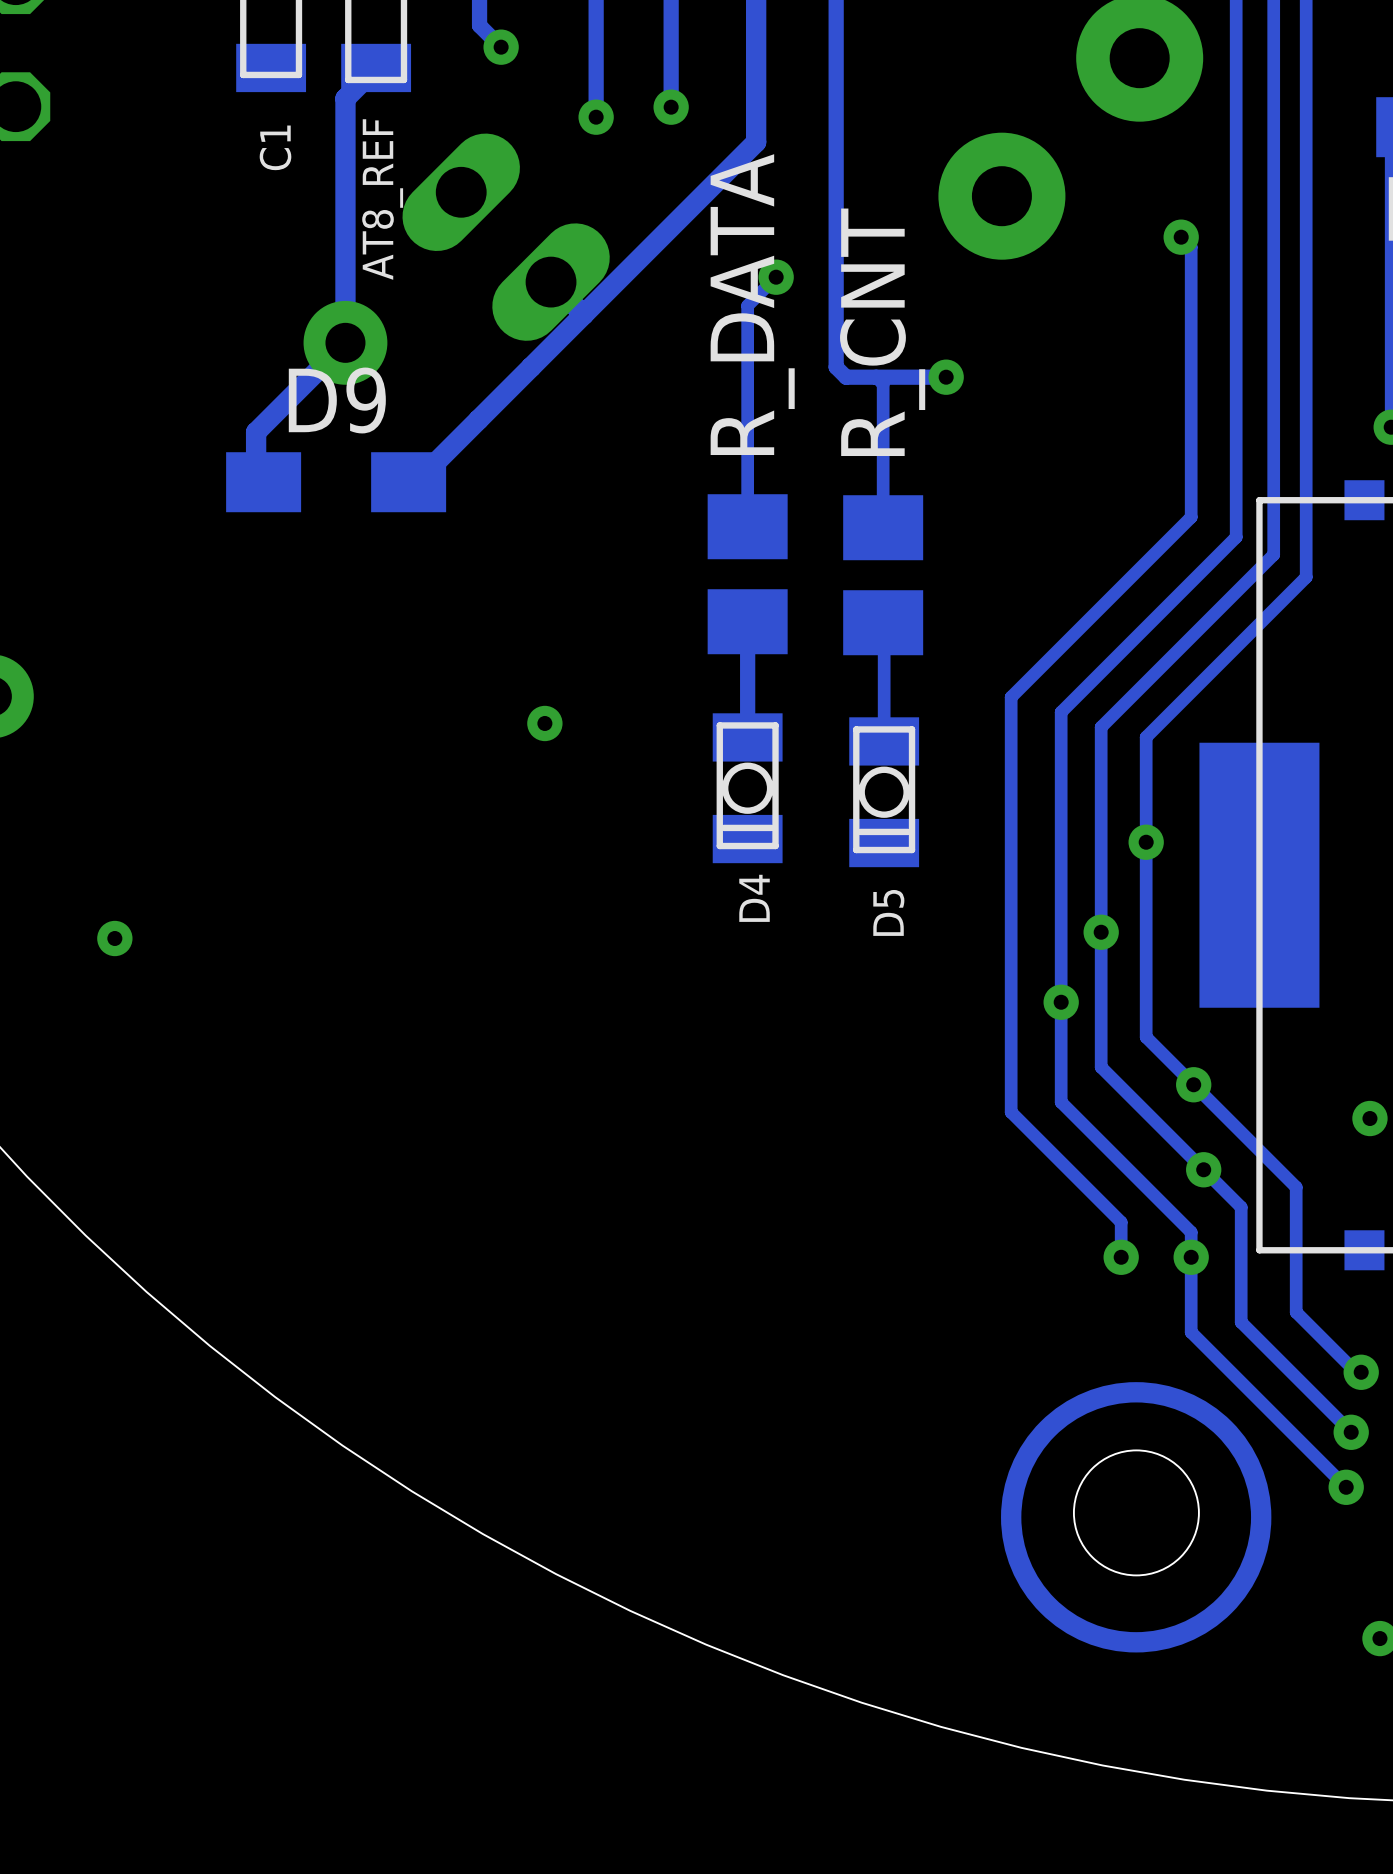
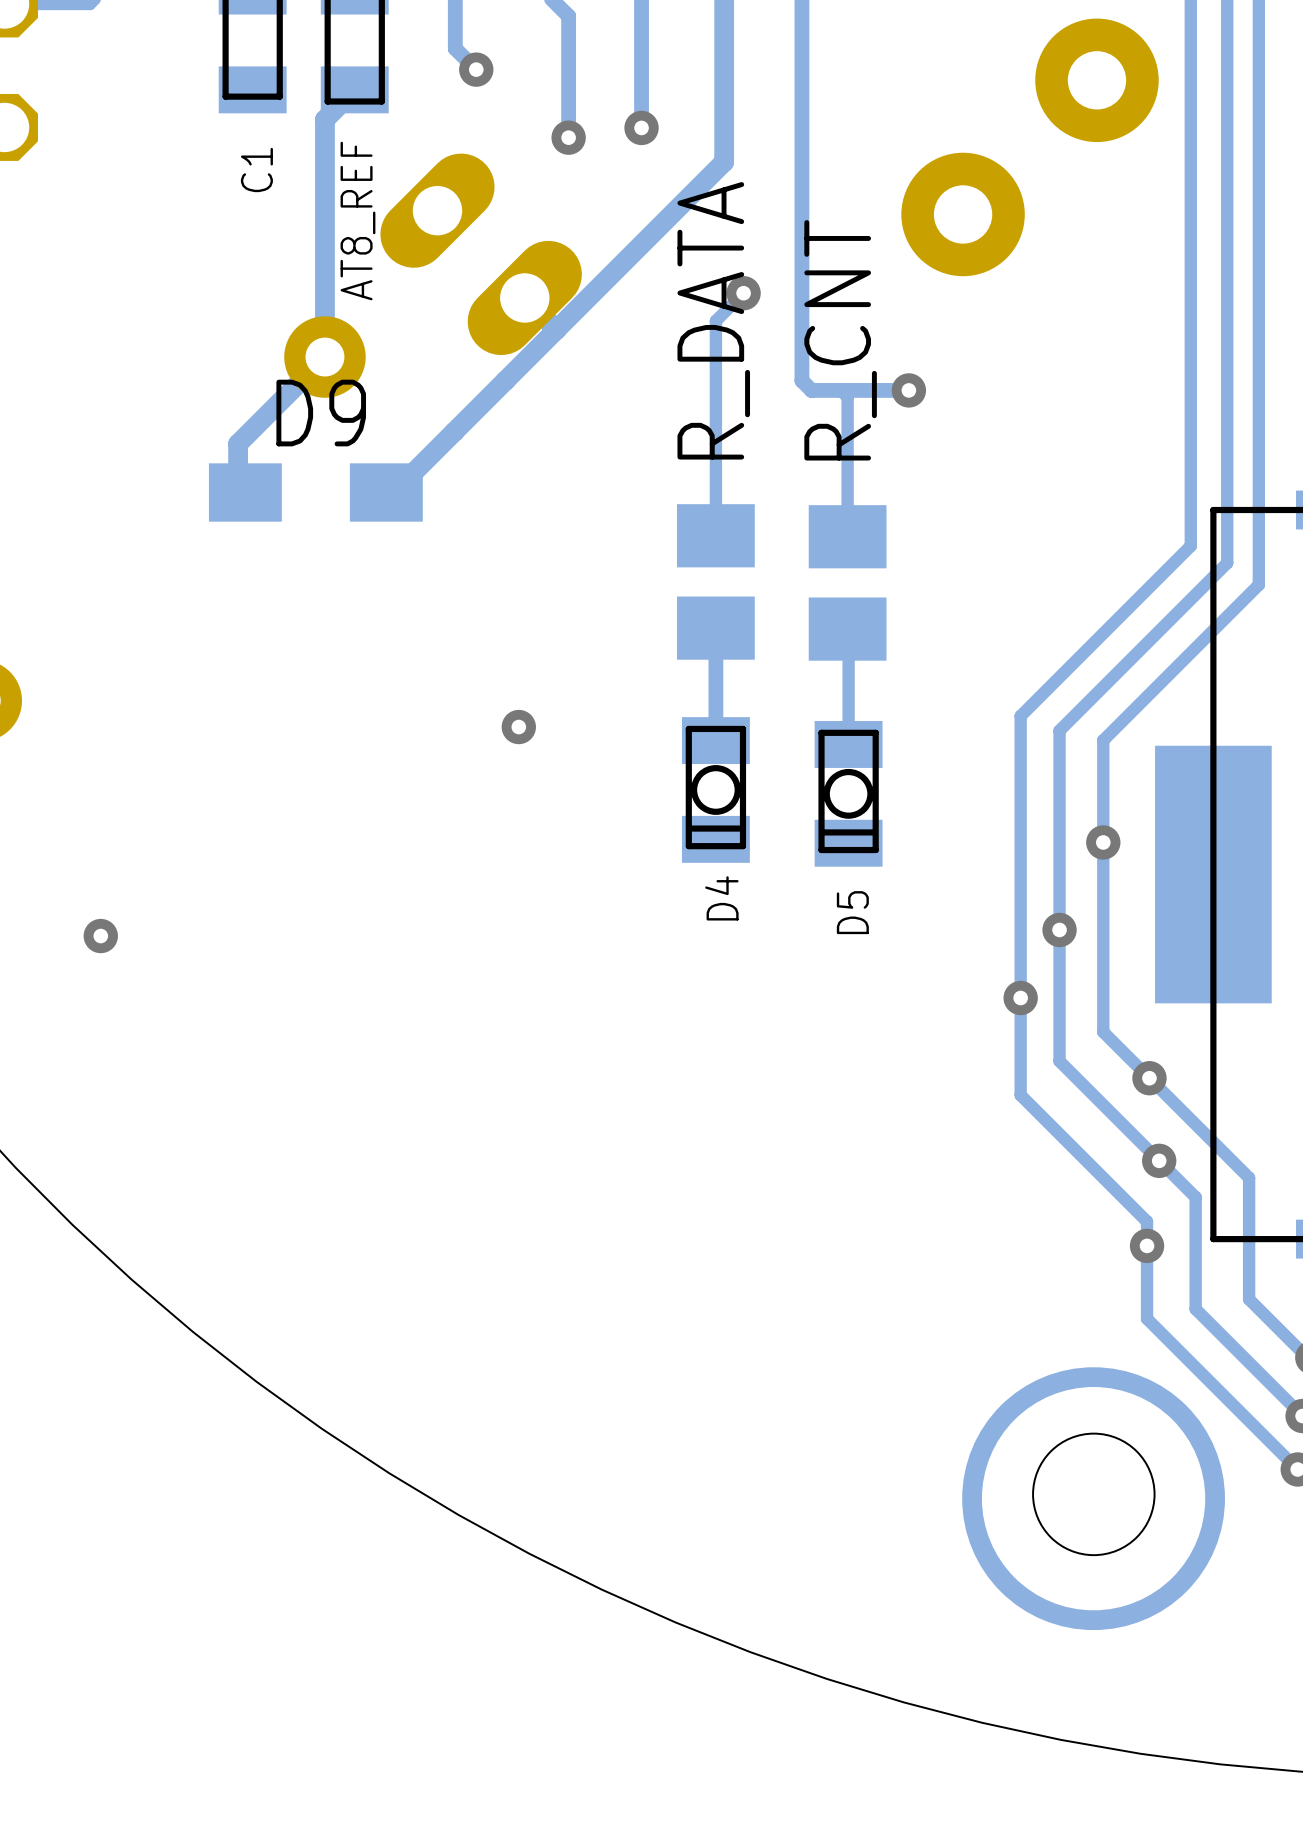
track: (1181, 237) (1191, 247) (1191, 517) (1011, 697) (1011, 1112) (1121, 1222) (1121, 1257) -> none
via: (1181, 237) -> none
via: (1121, 1257) -> none

